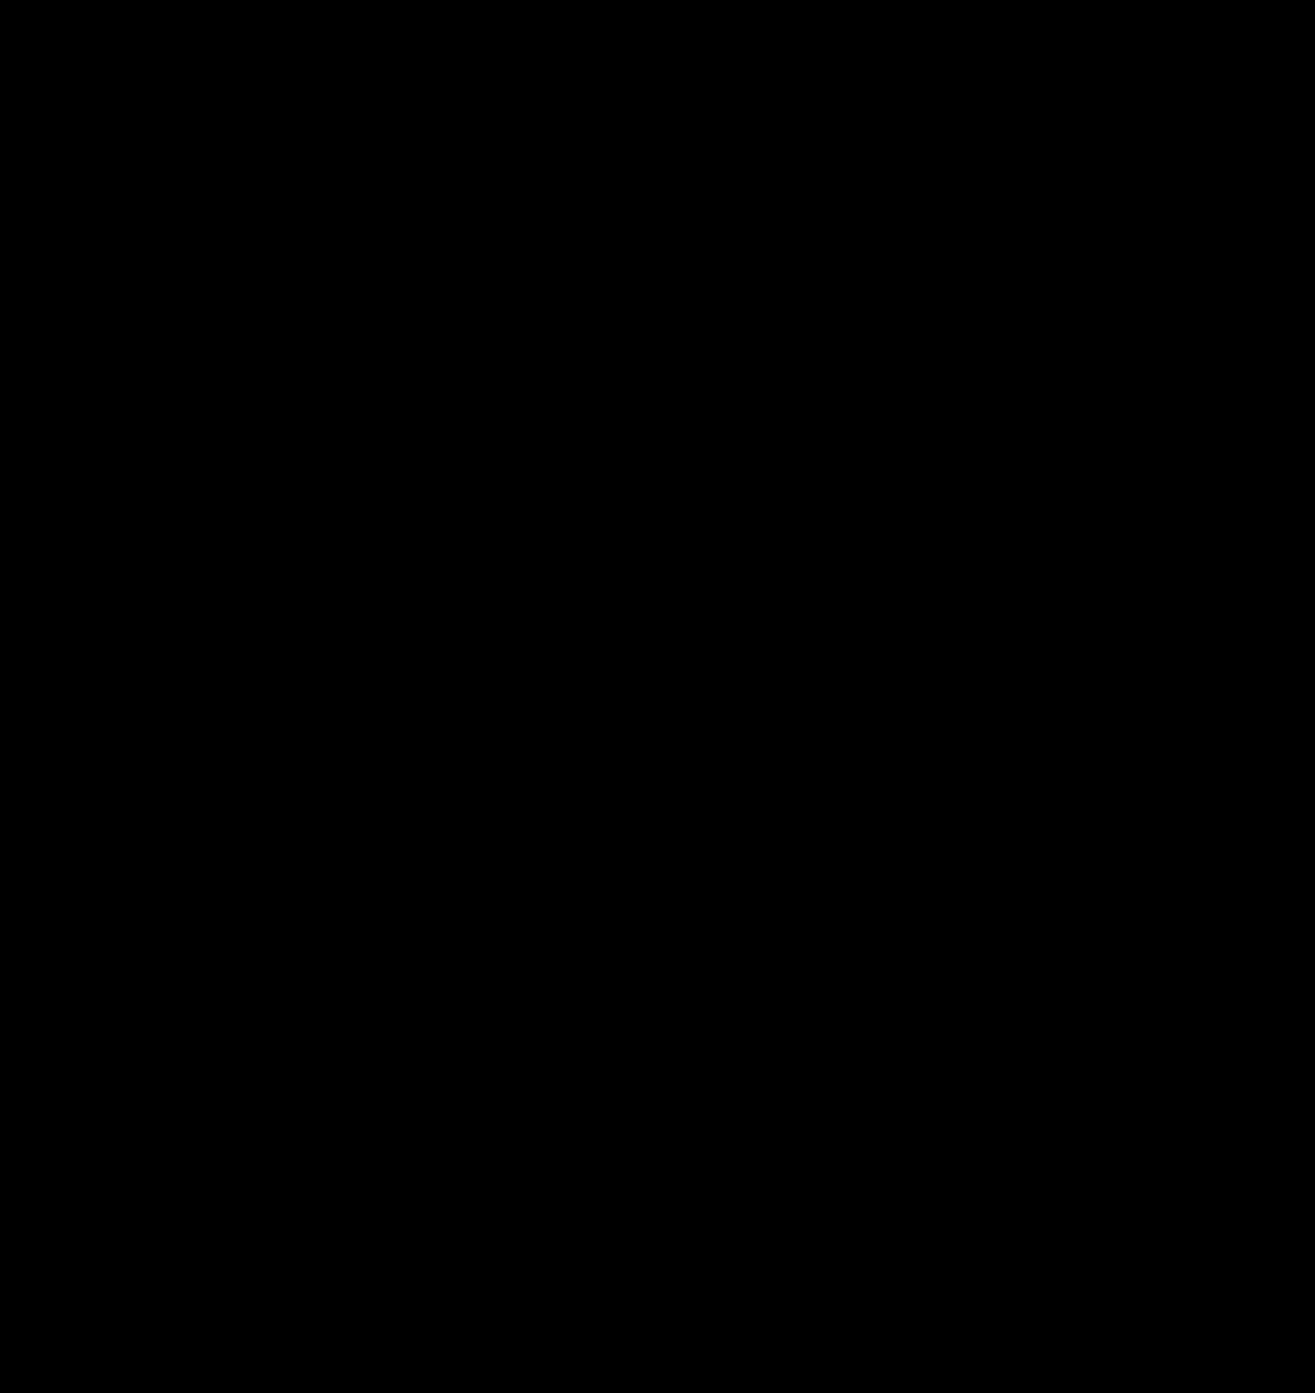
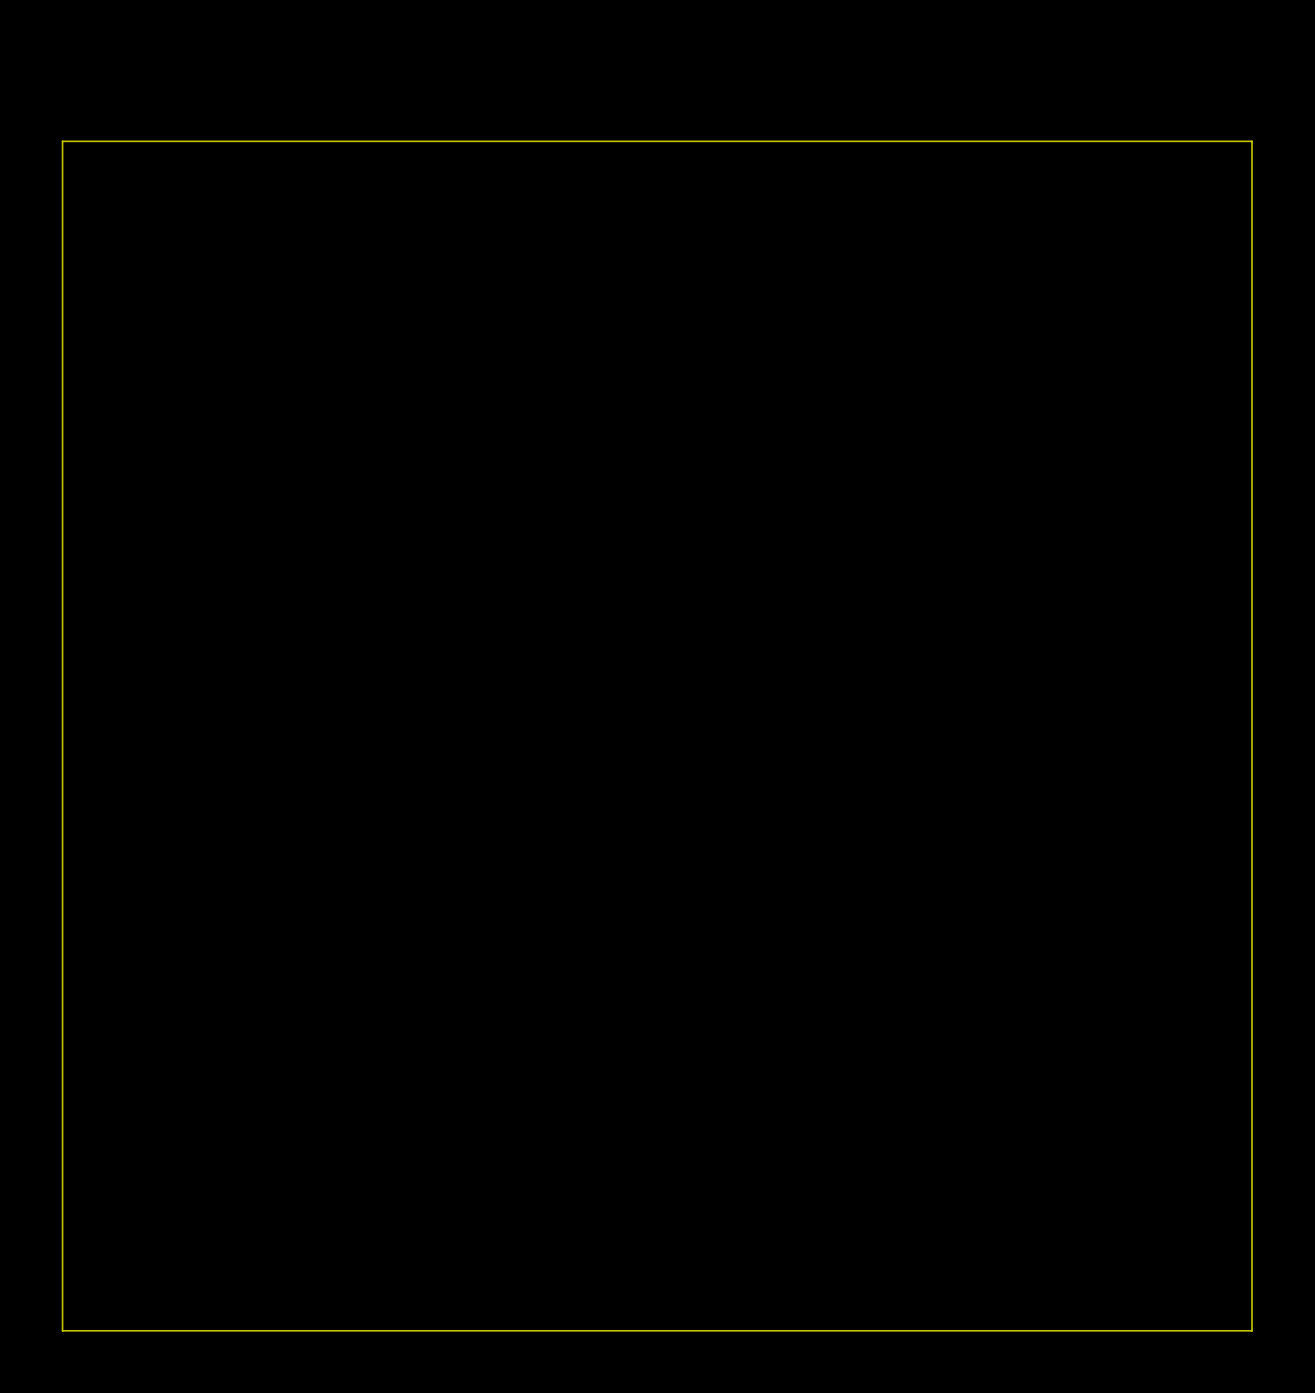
board edge: none -> (62, 141) (1252, 141) (1252, 1330) (62, 1330) (62, 141)

